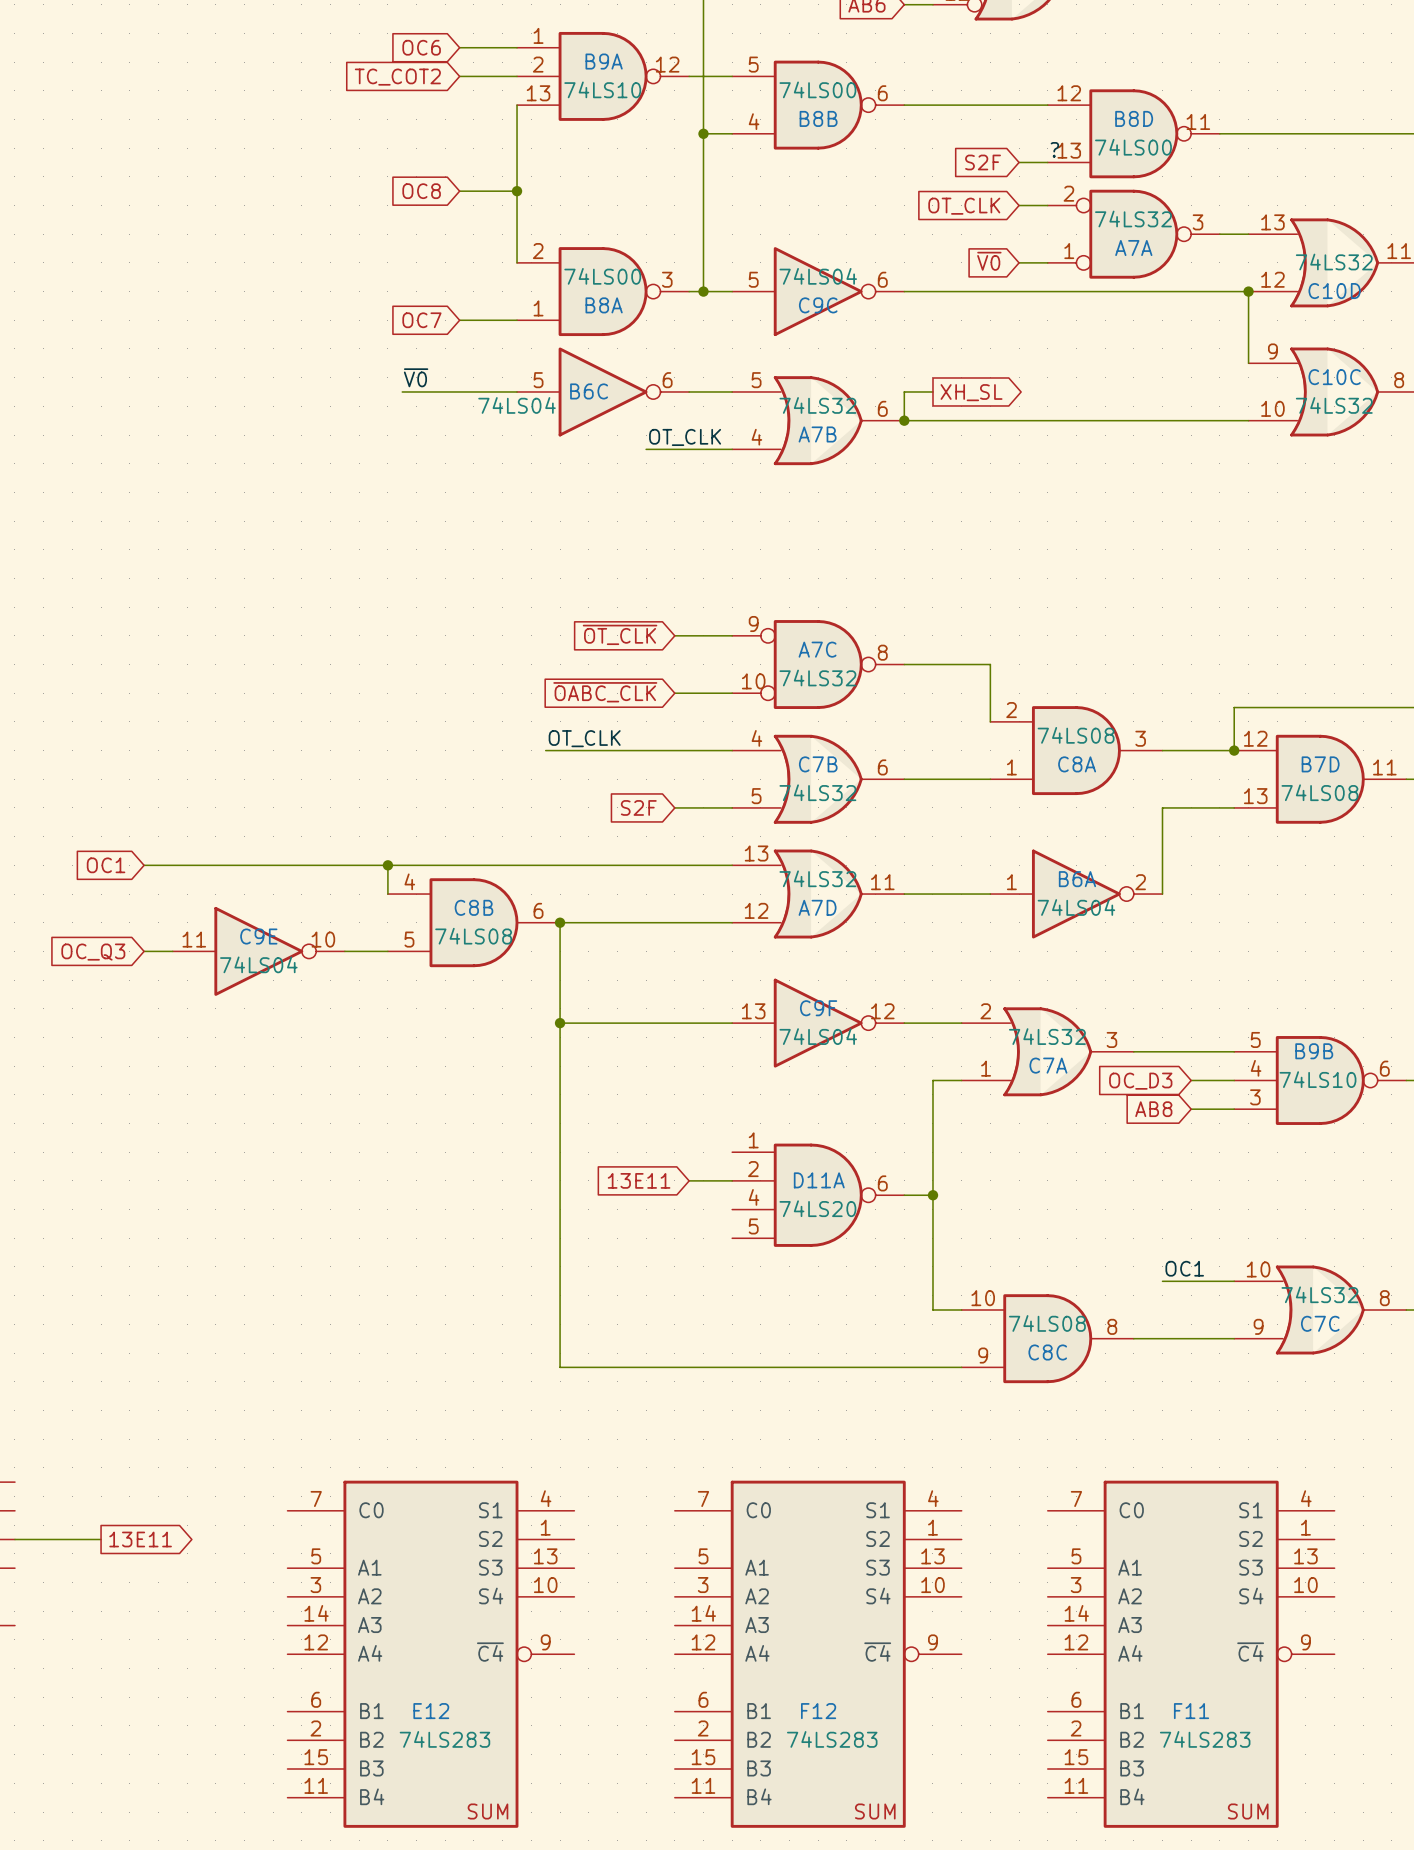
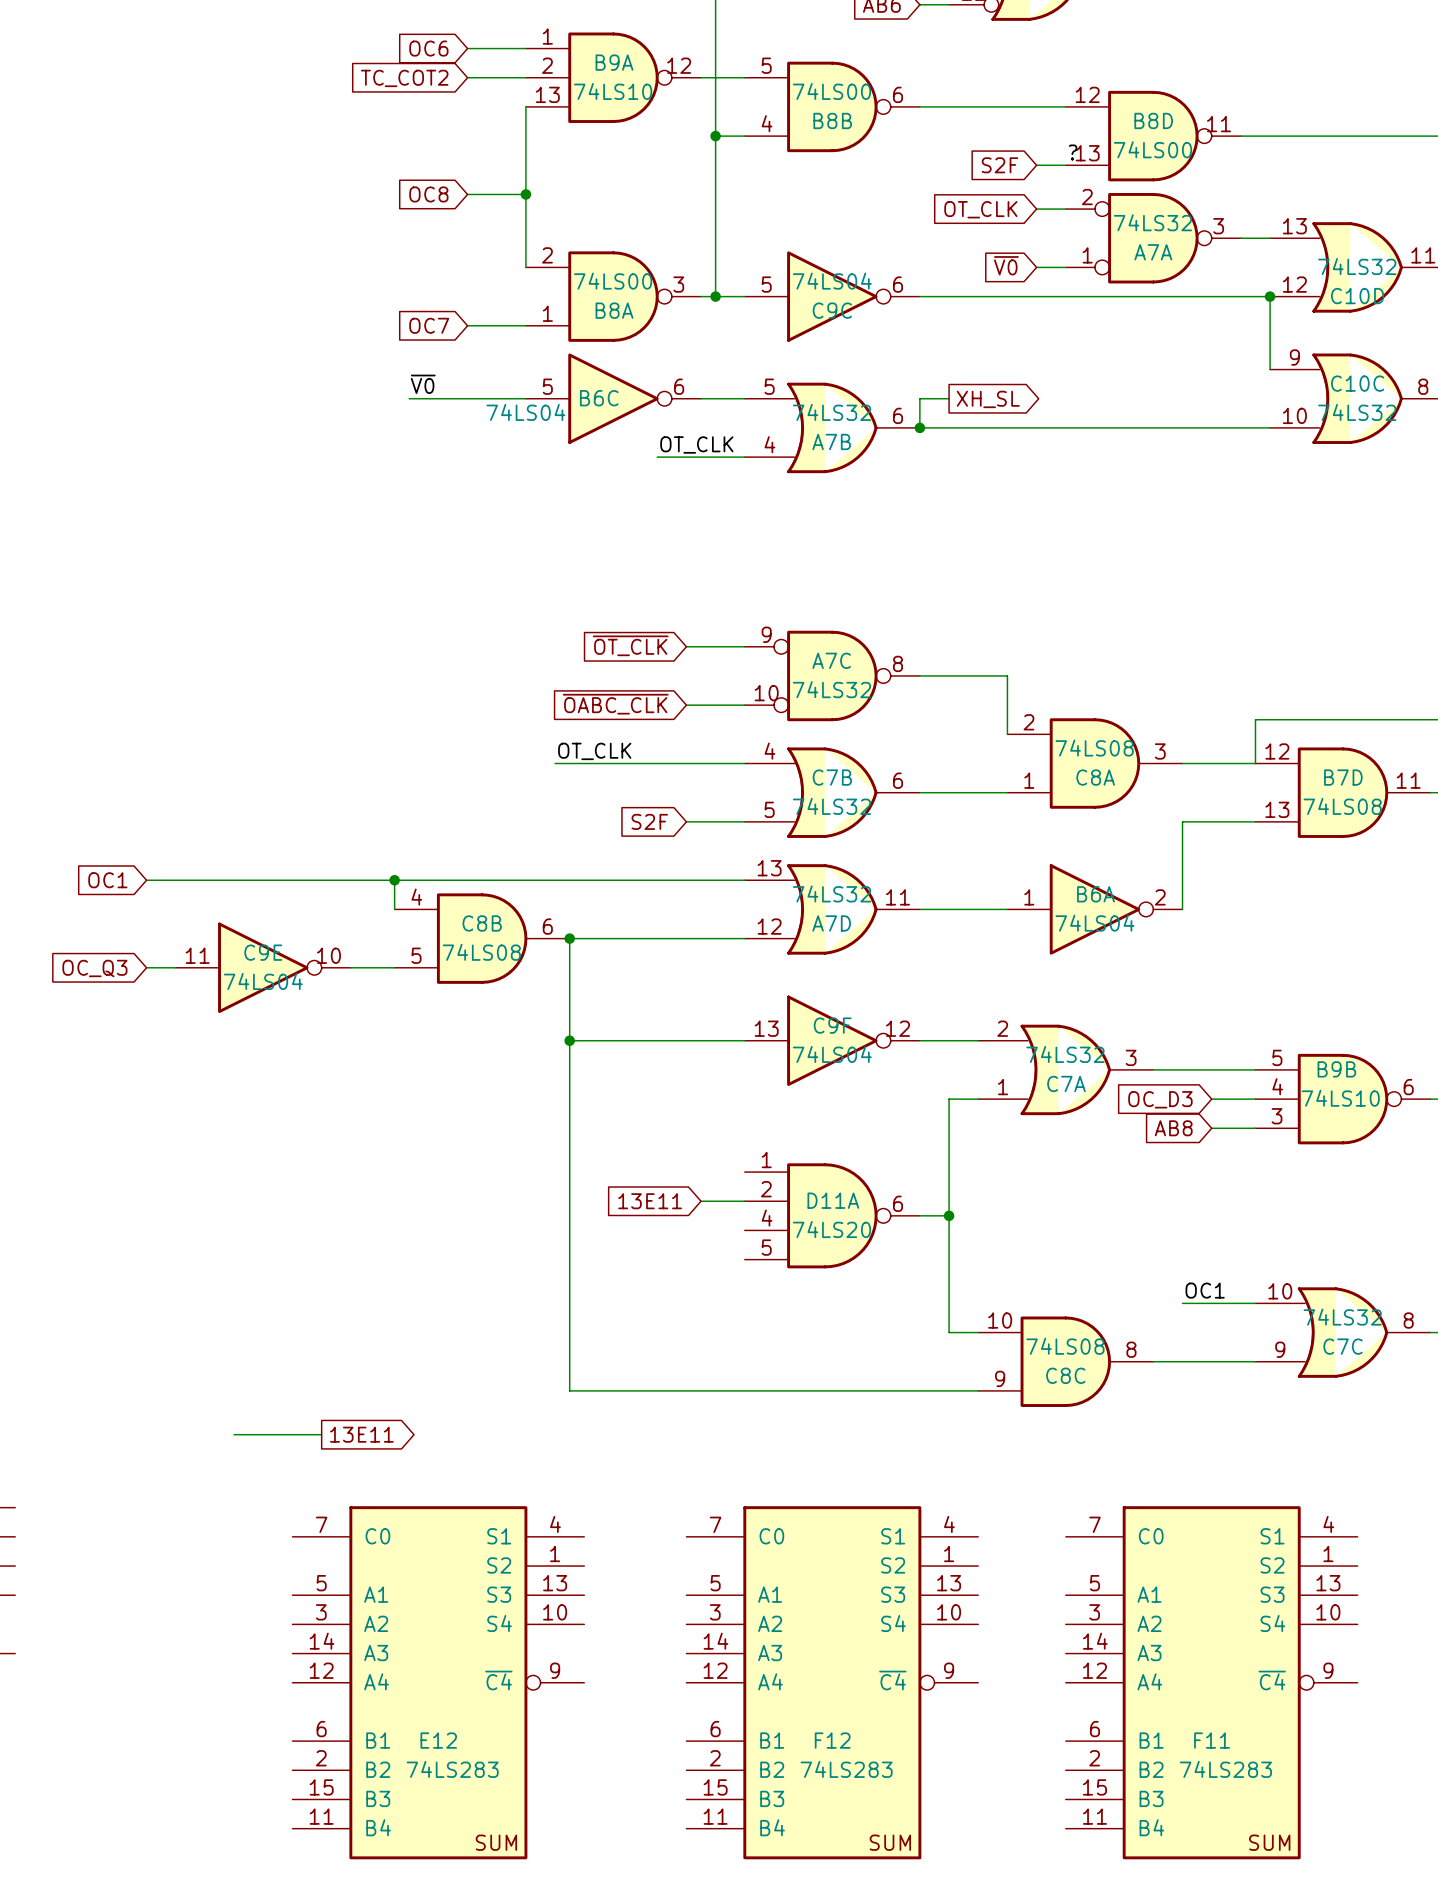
junction: (1234, 750) -> none
wire: (14, 1539) (101, 1539) -> (234, 1434) (321, 1434)
global label position: 13E11 (140, 1539) -> 13E11 (361, 1434)

